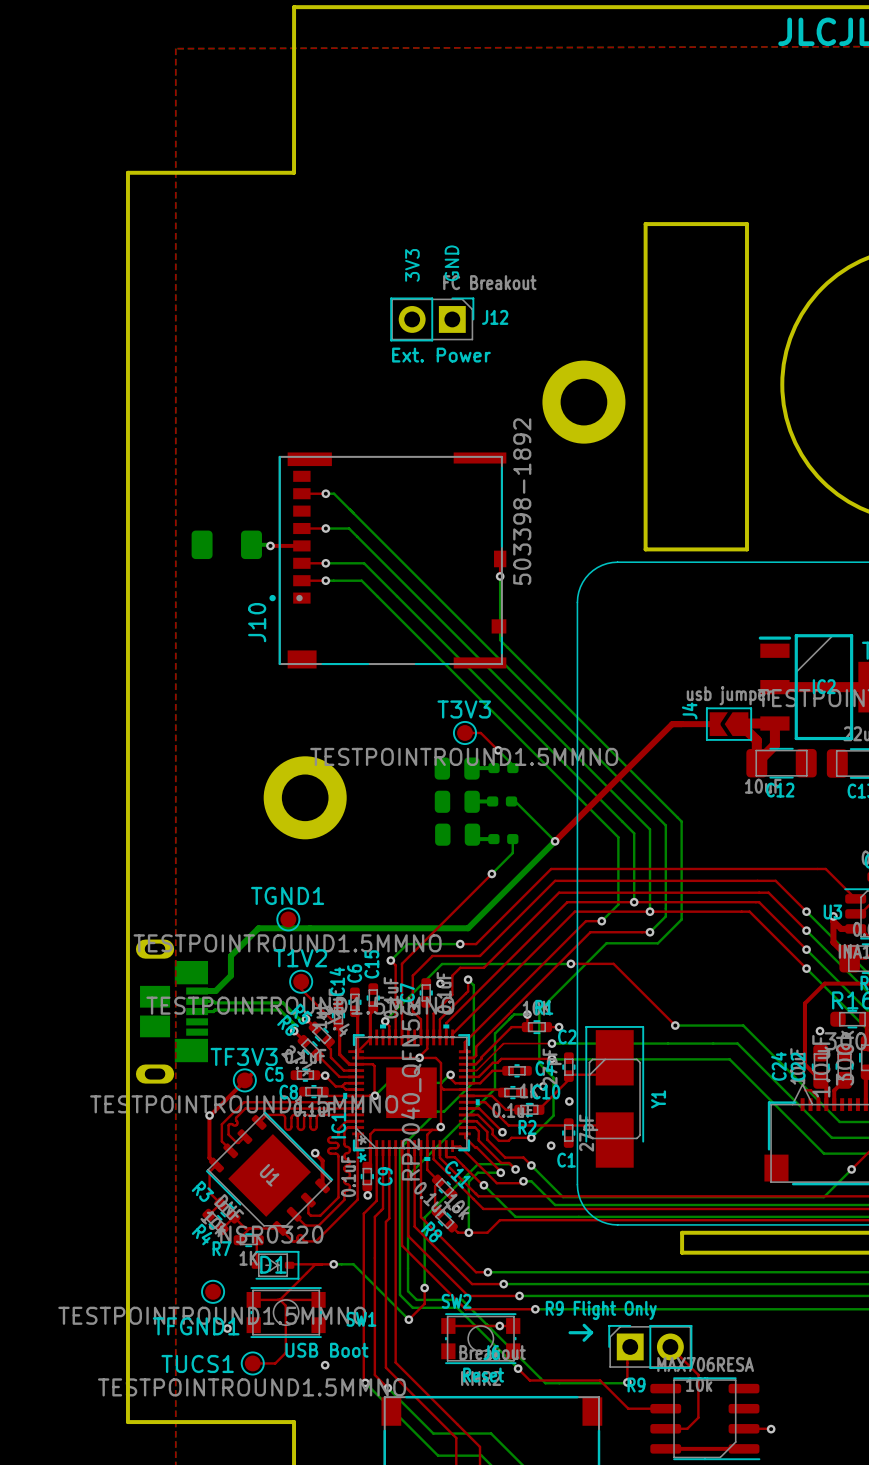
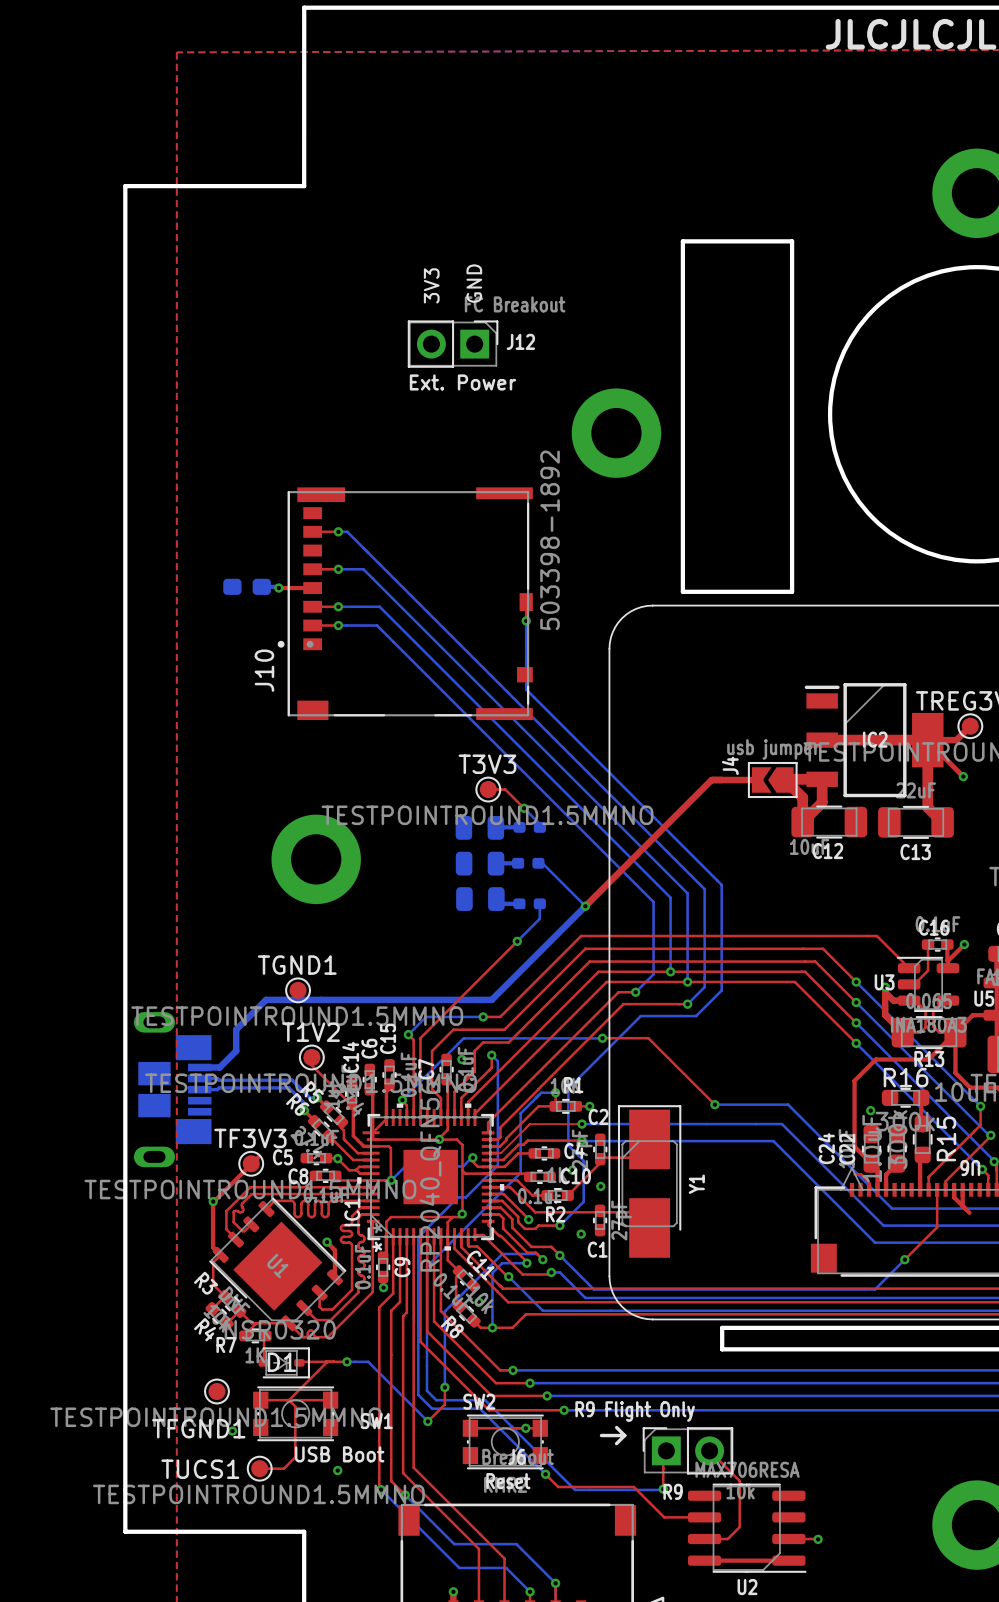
part footprint: [191, 530, 262, 560] -> [223, 578, 271, 595]

